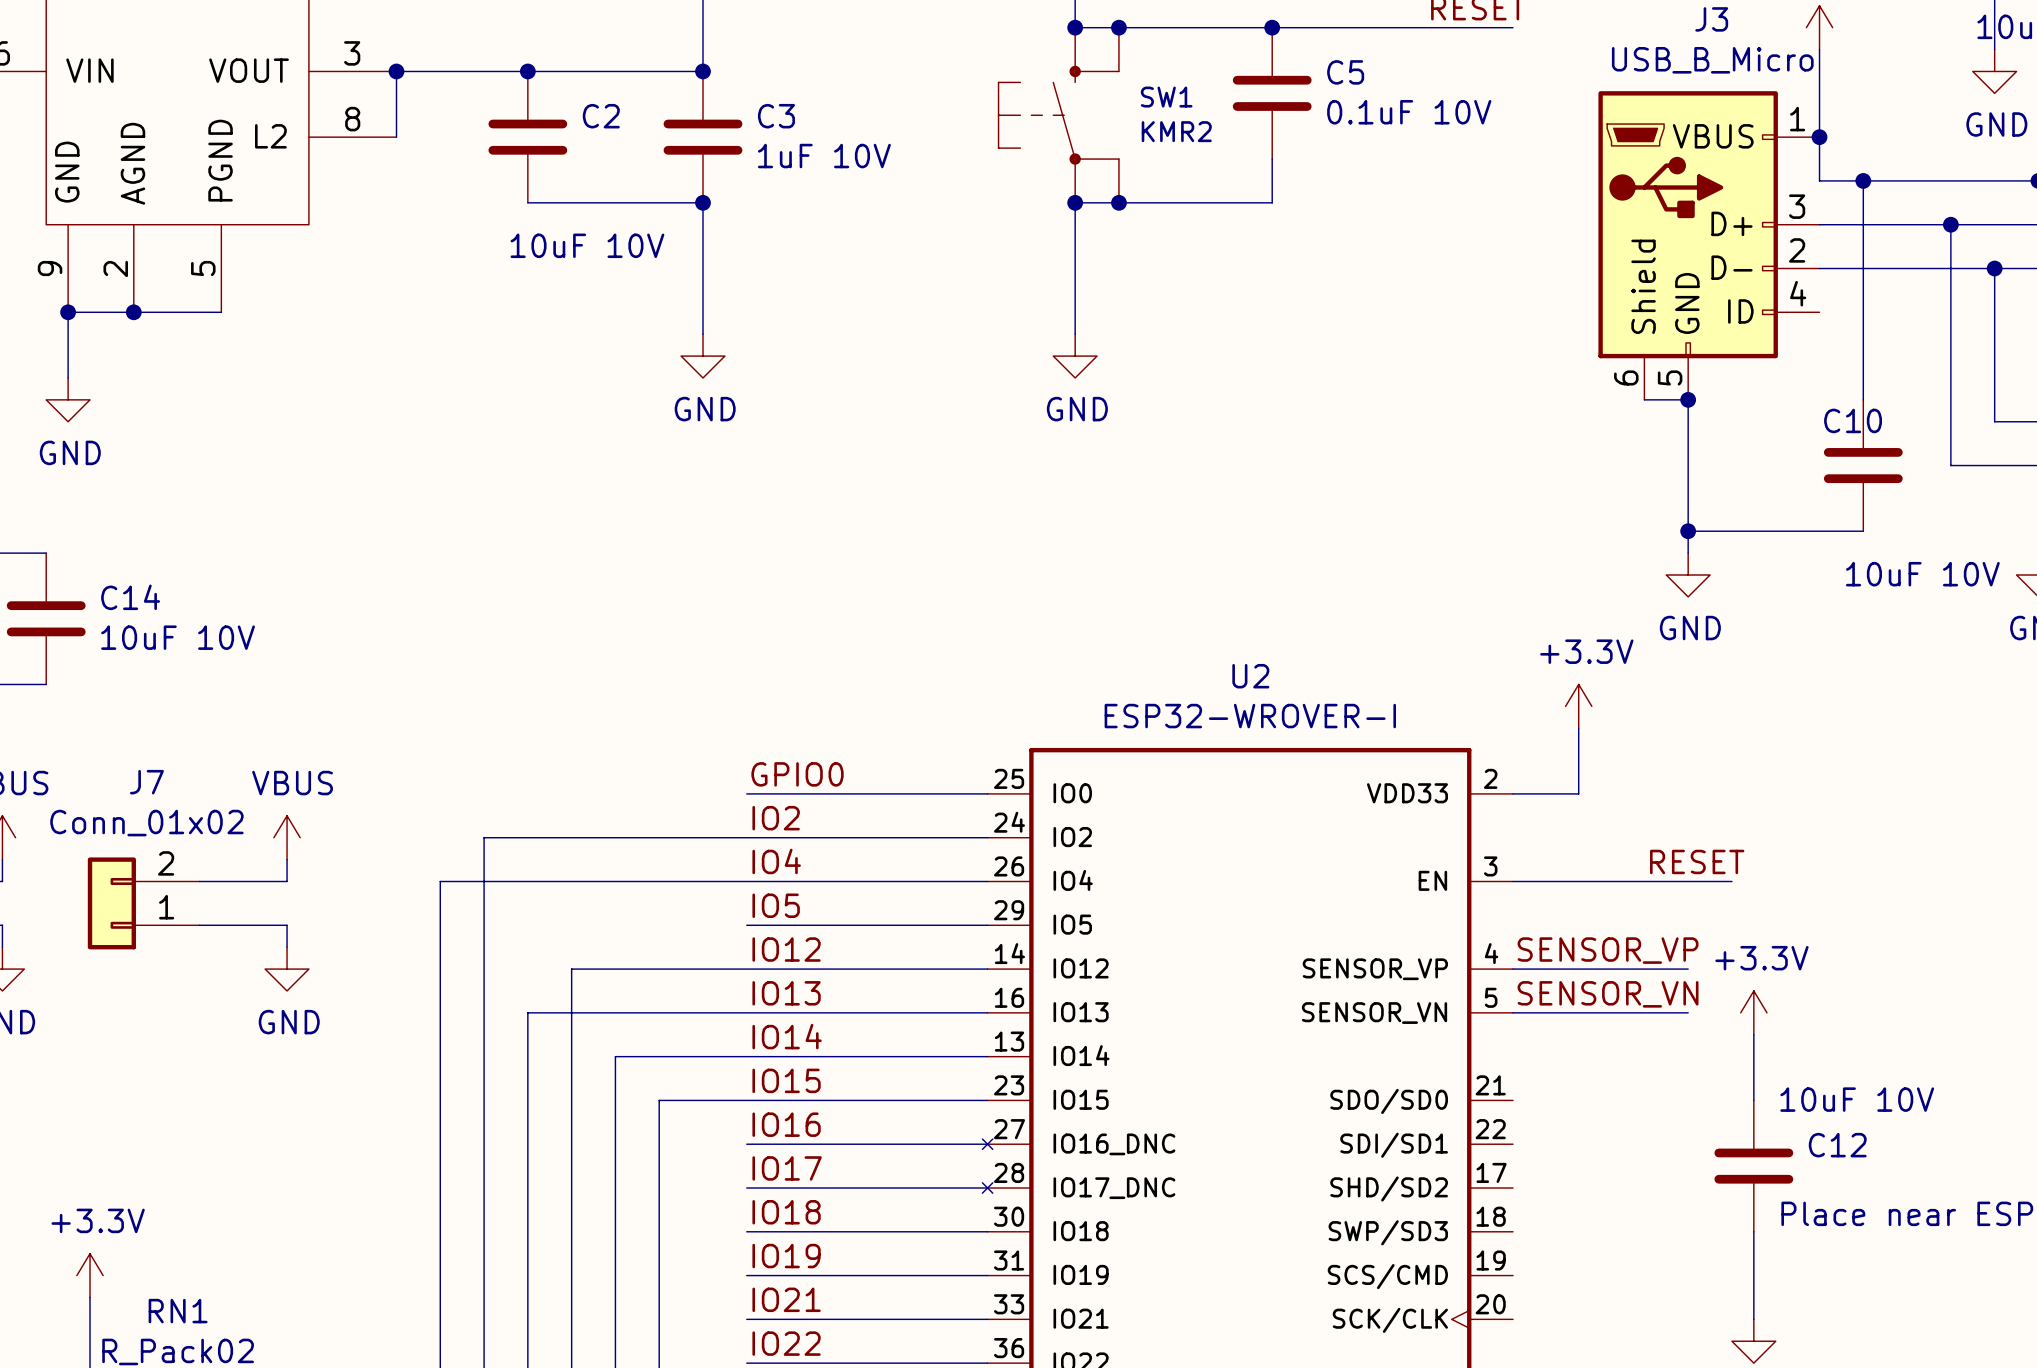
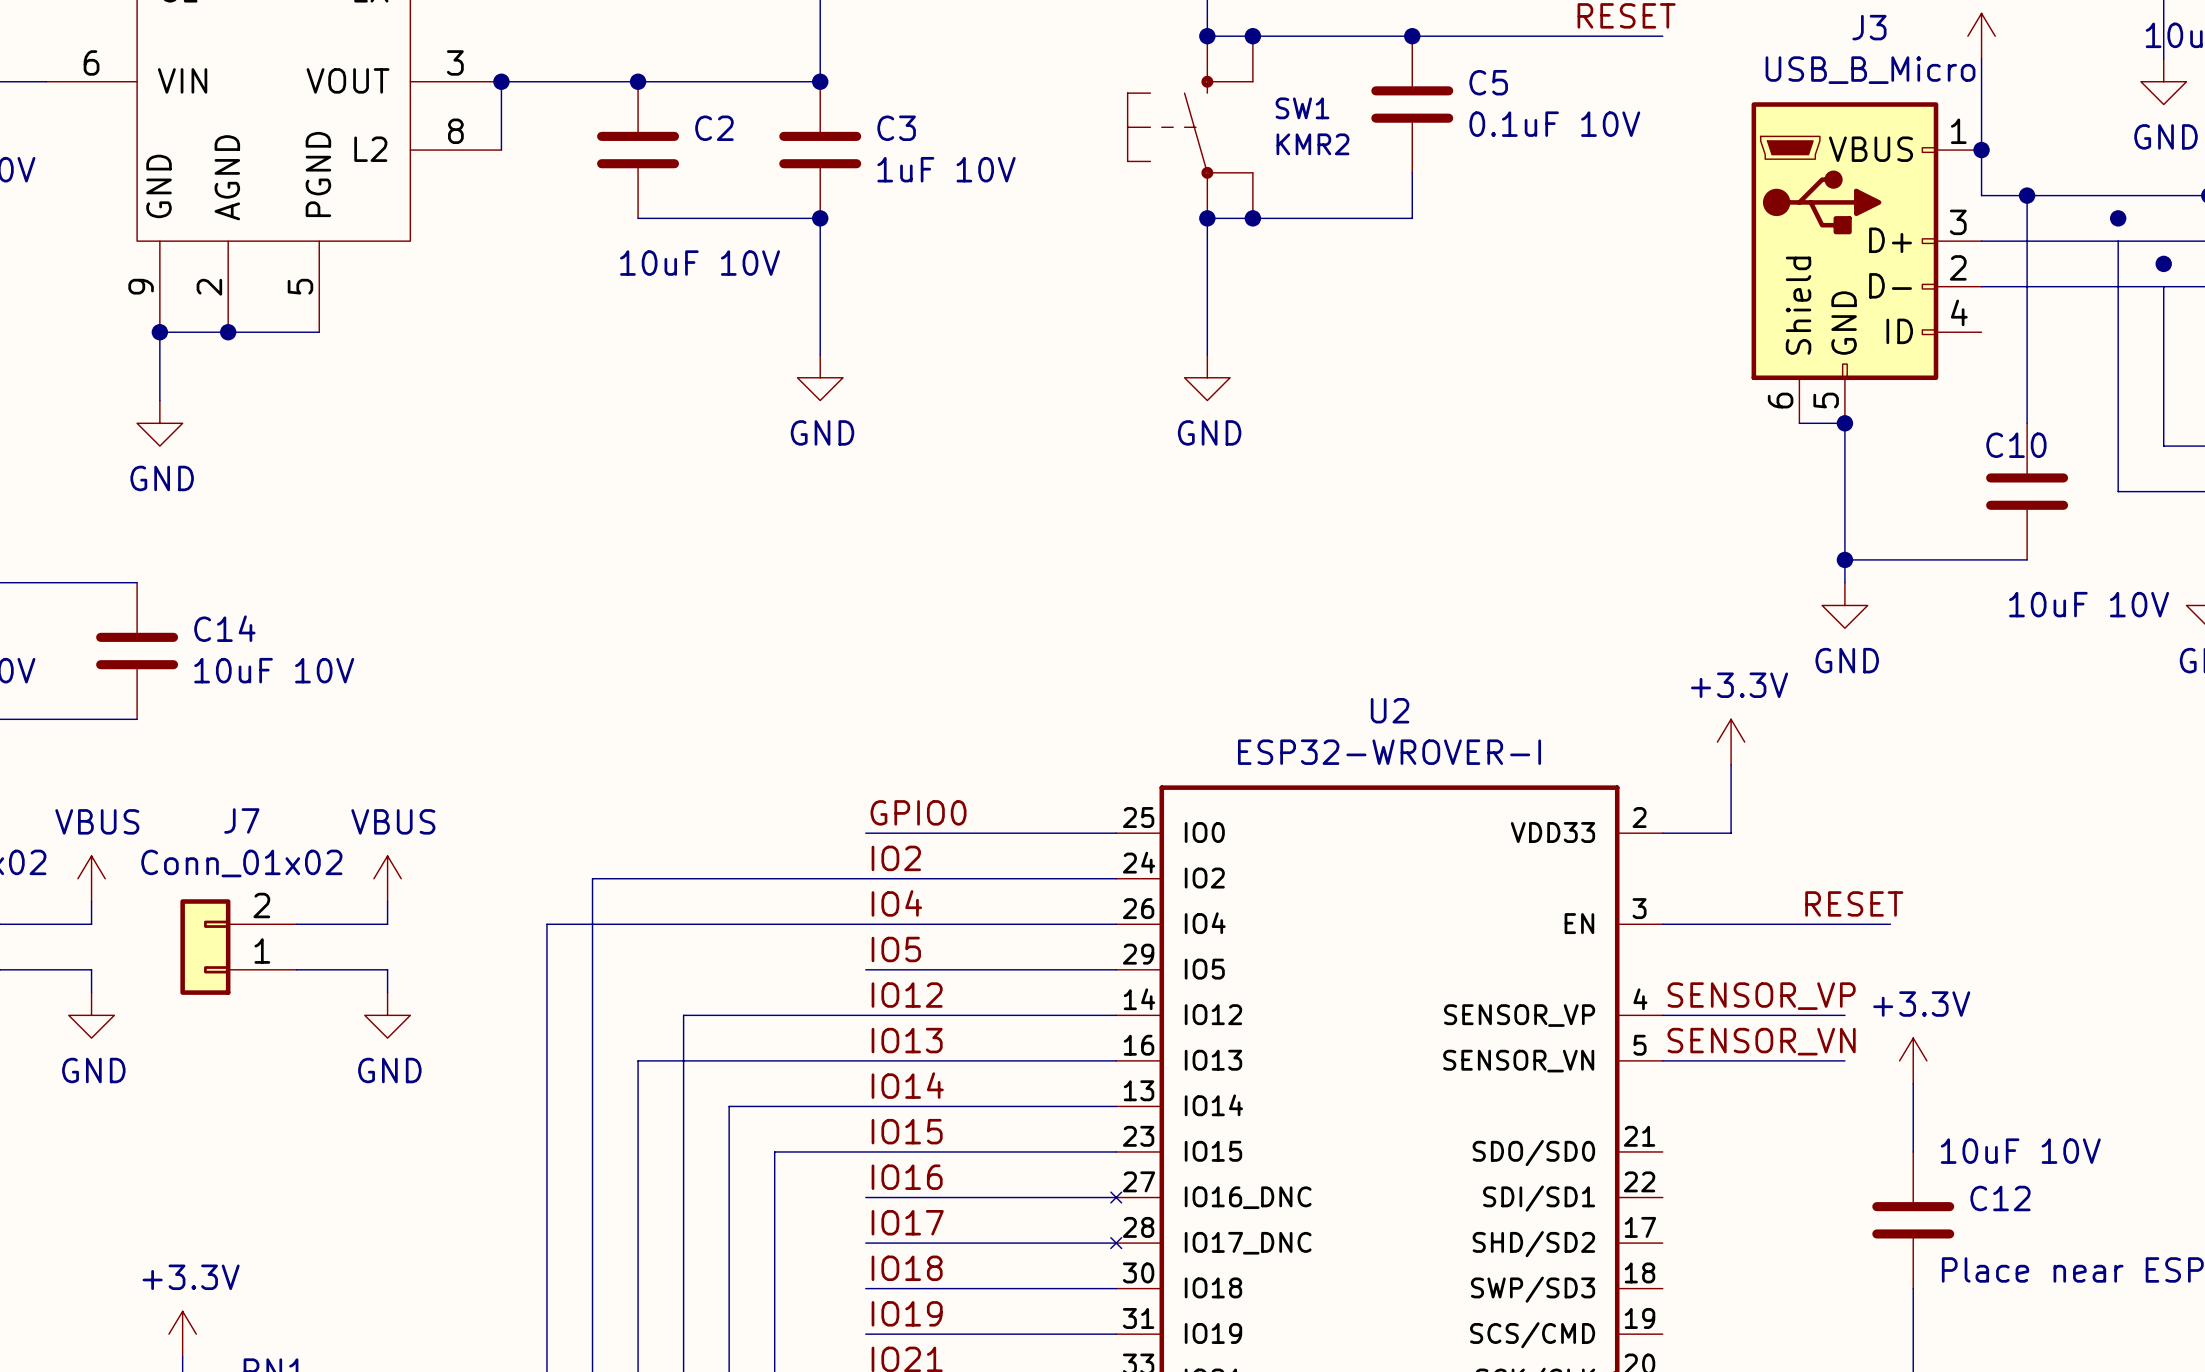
junction position: (1950, 224) -> (2118, 218)
junction position: (1994, 268) -> (2163, 263)

